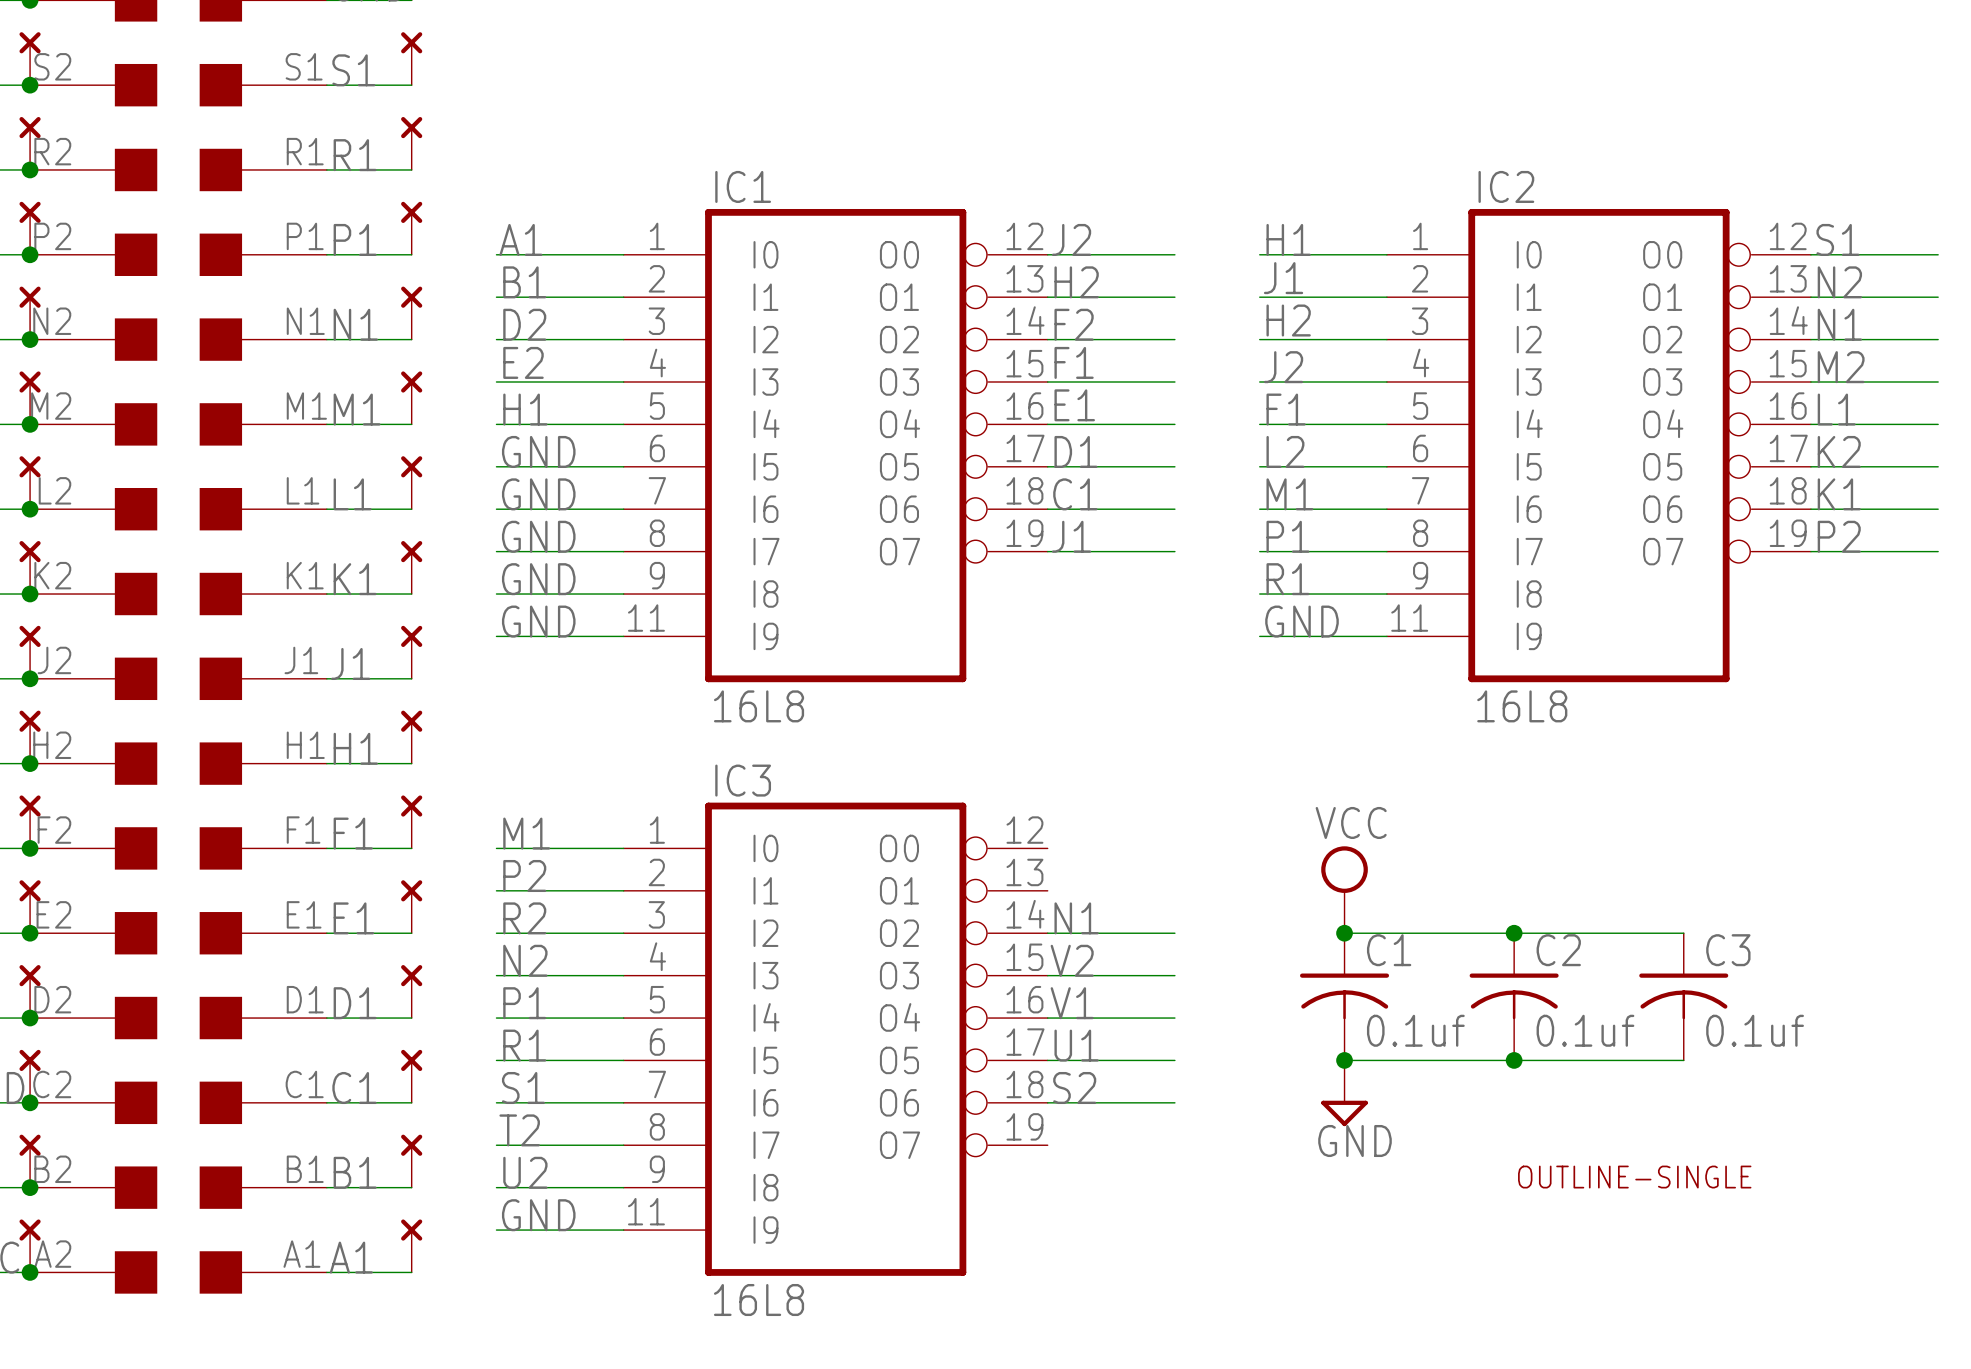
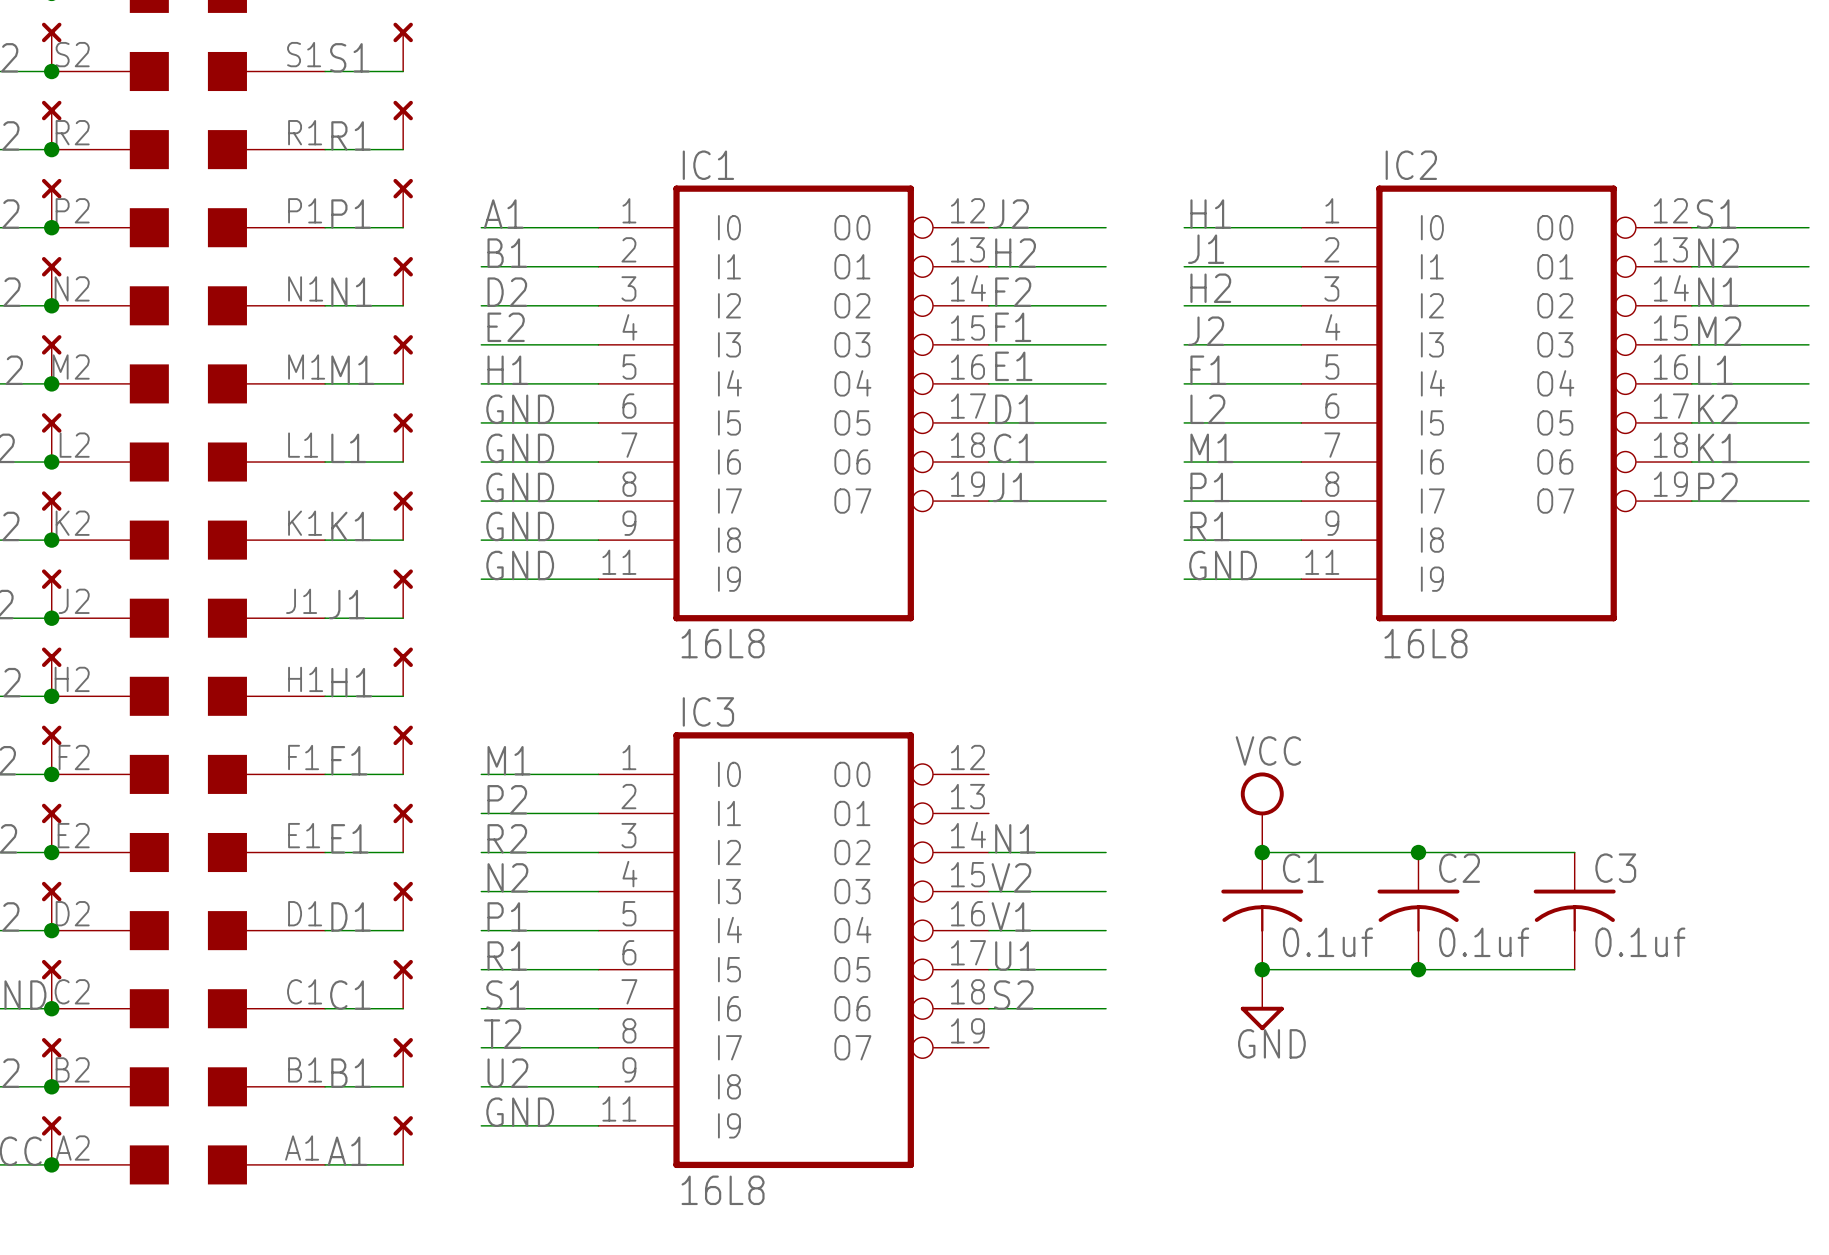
part: OUTLINE-SINGLE (1634, 1177) -> none

